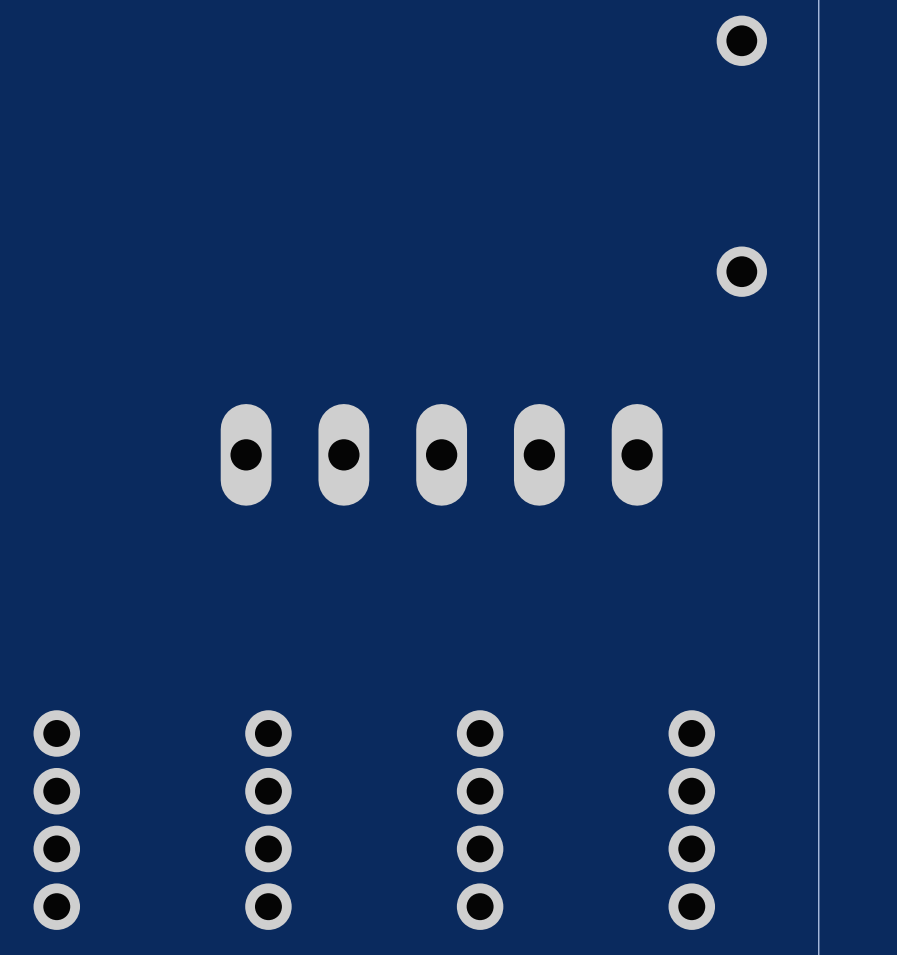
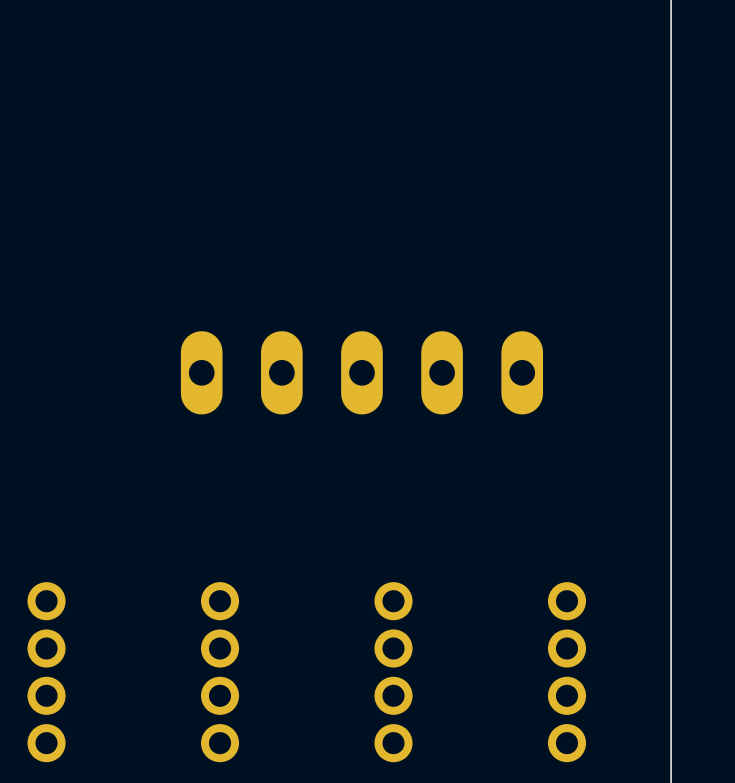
part: (741, 40) -> none
part: (741, 271) -> none

